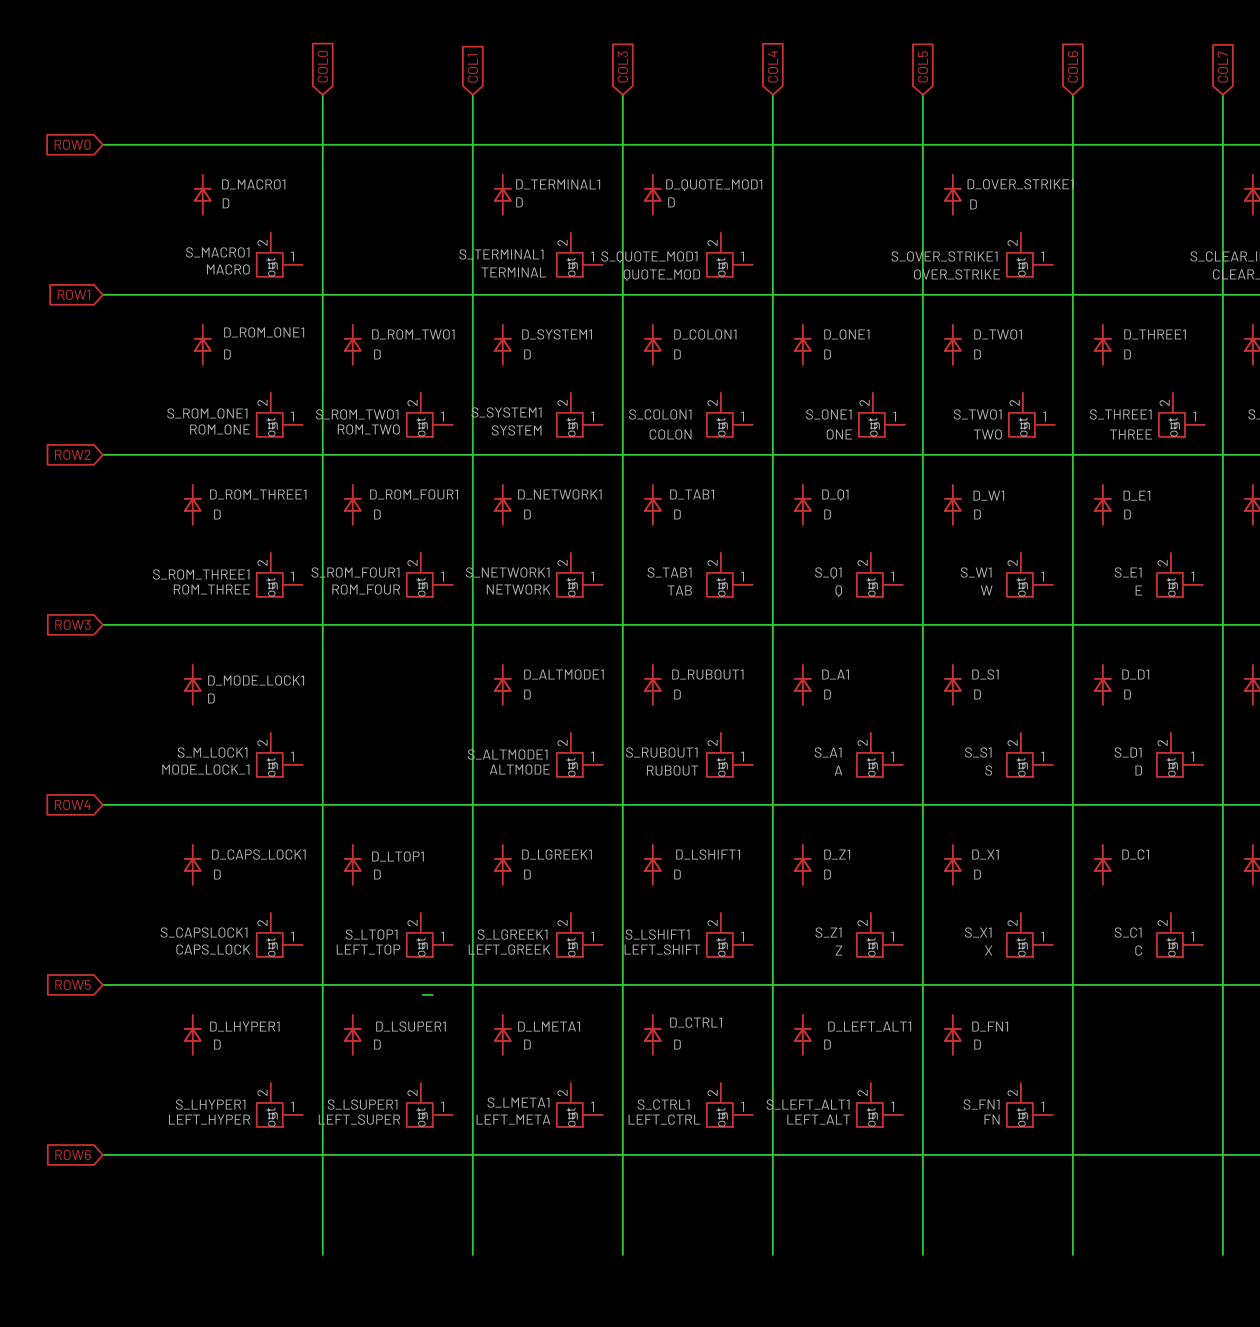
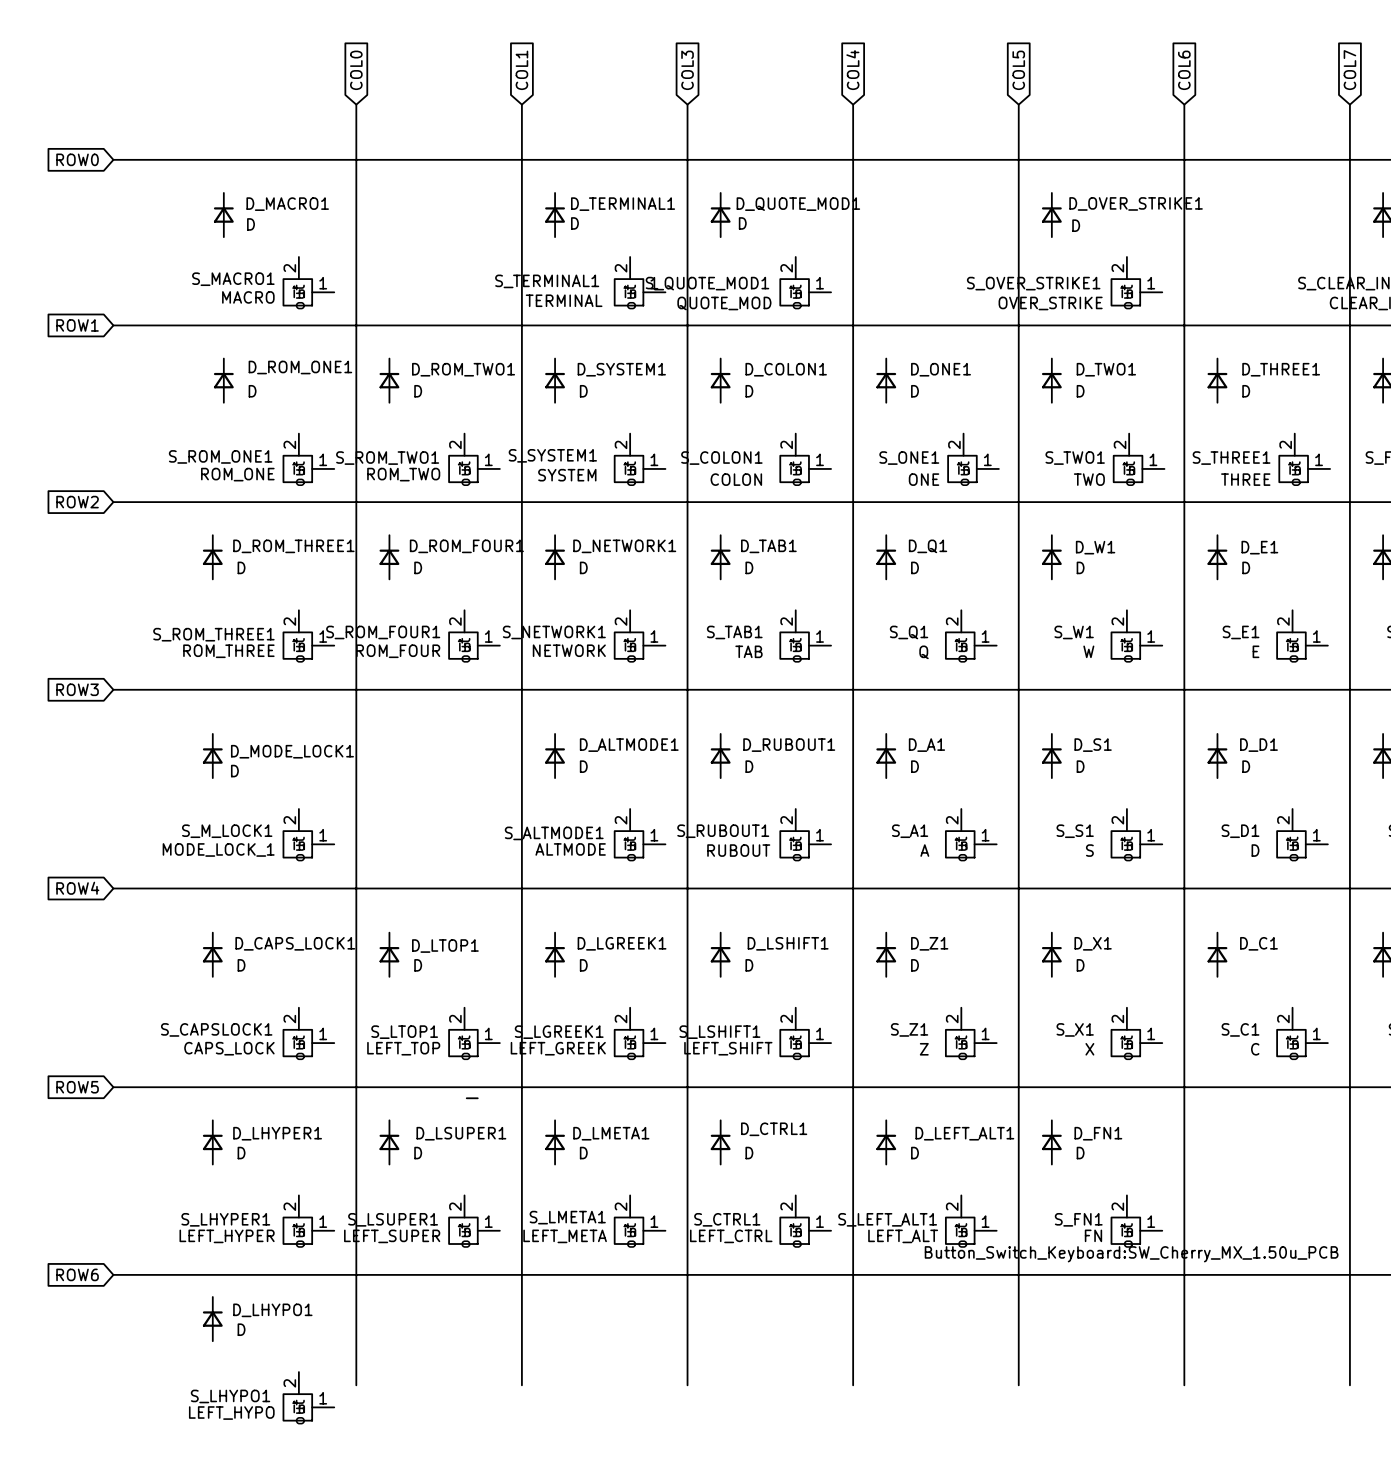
S_FN1 text: none -> Button_Switch_Keyboard:SW_Cherry_MX_1.50u_PCB (1131, 1254)
D_LHYPO1: none -> D (212, 1319)
S_LHYPO1: none -> LEFT_HYPO (308, 1396)

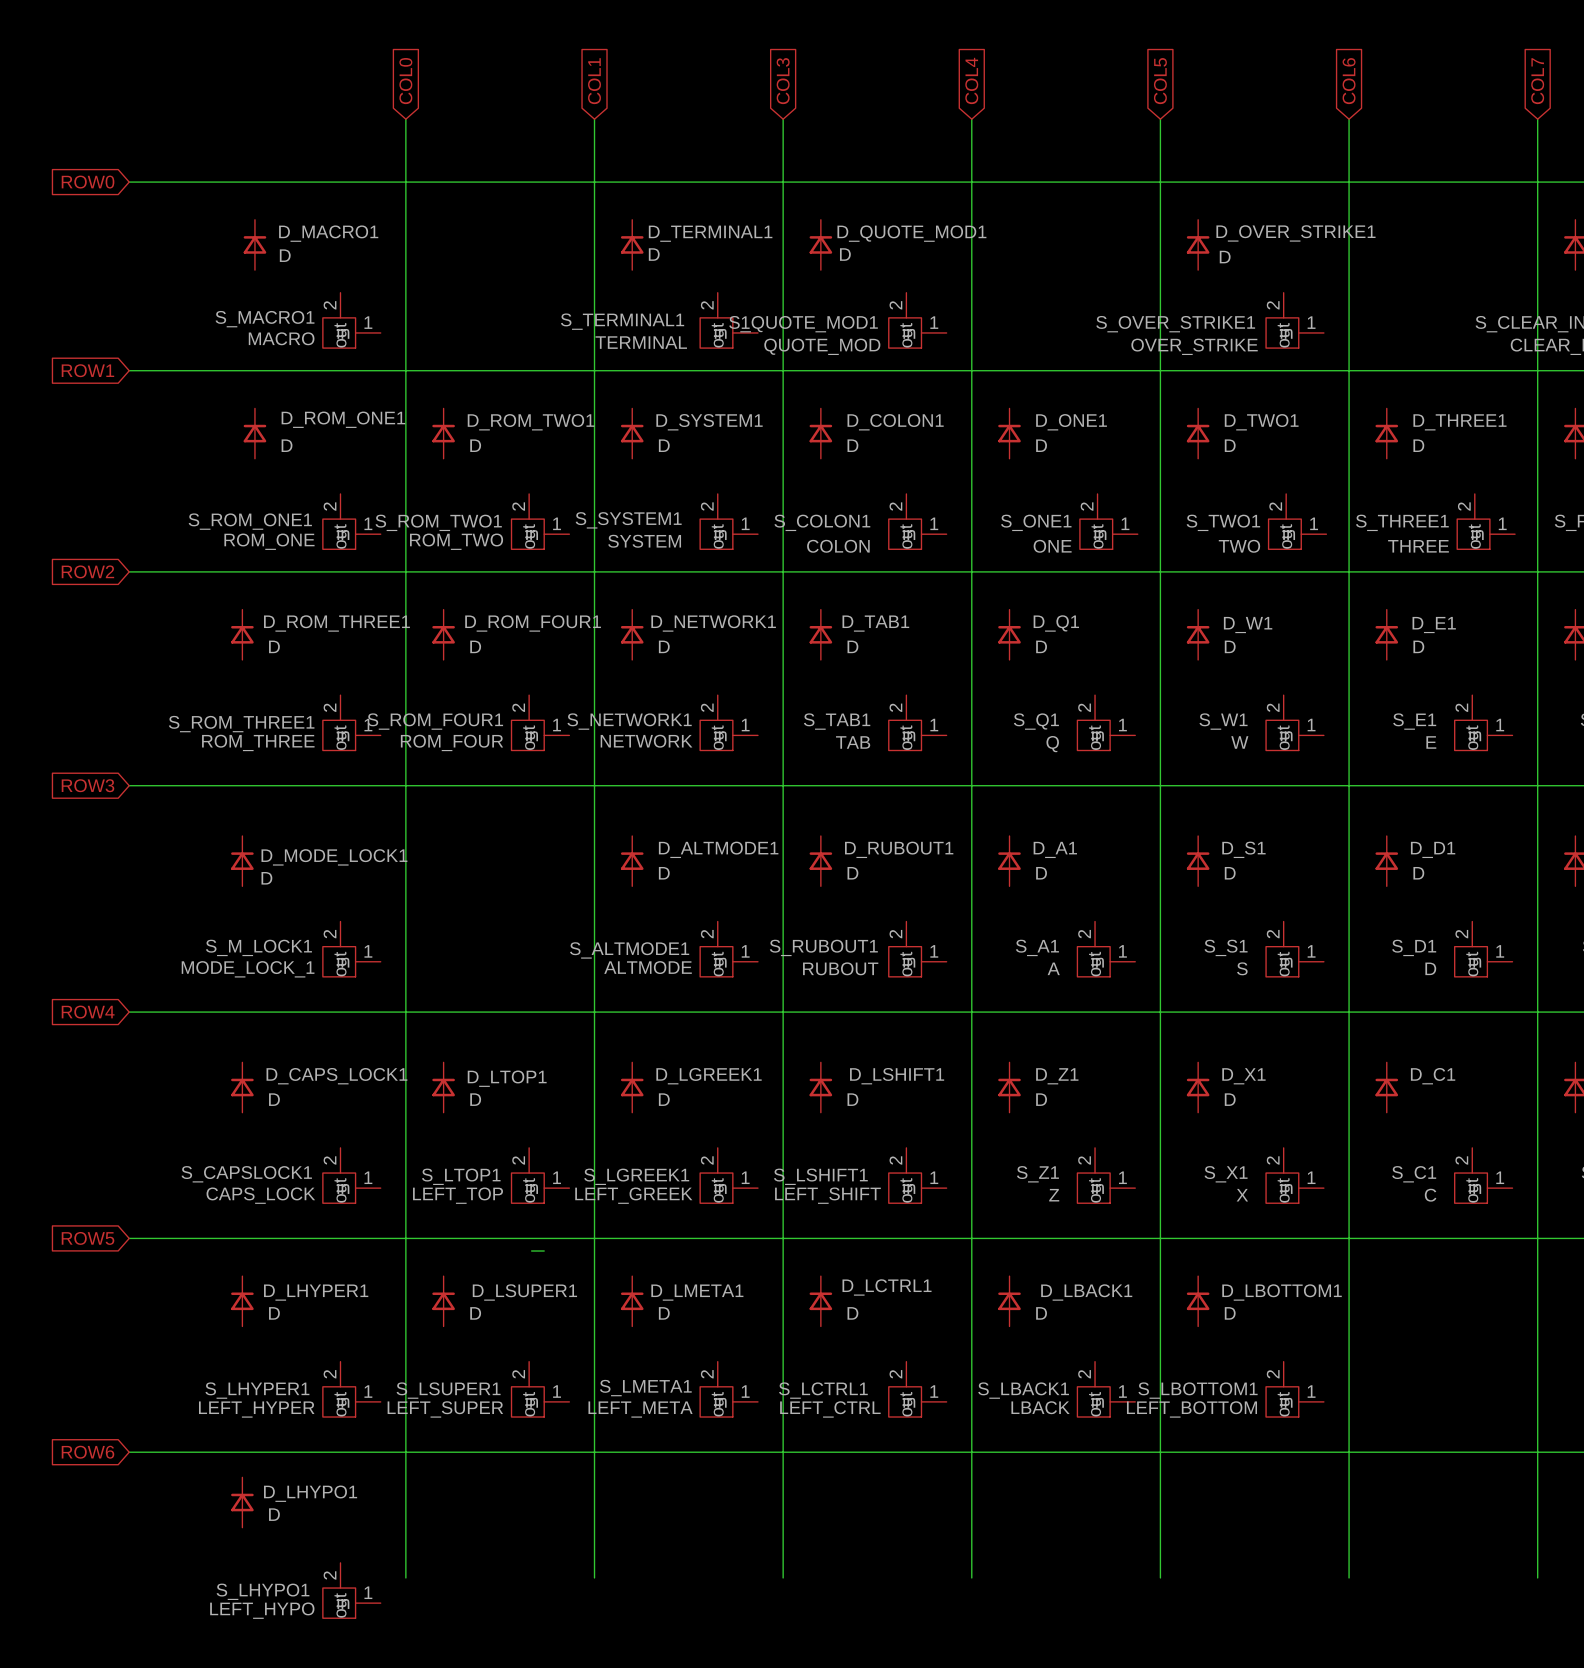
D_CTRL1 name: D_CTRL1 (774, 1129) -> D_LCTRL1 (887, 1287)
D_LEFT_ALT1 name: D_LEFT_ALT1 (964, 1133) -> D_LBACK1 (1086, 1292)
D_FN1 name: D_FN1 (1098, 1133) -> D_LBOTTOM1 (1282, 1292)
S_CTRL1 name: S_CTRL1 (727, 1219) -> S_LCTRL1 (823, 1390)
S_LEFT_ALT1 name: S_LEFT_ALT1 (887, 1219) -> S_LBACK1 (1023, 1390)
S_FN1 name: S_FN1 (1078, 1219) -> S_LBOTTOM1 (1198, 1390)
S_FN1 value: FN (1093, 1235) -> LEFT_BOTTOM (1191, 1409)
S_LEFT_ALT1 value: LEFT_ALT (903, 1236) -> LBACK (1040, 1407)
S_FN1 text: Button_Switch_Keyboard:SW_Cherry_MX_1.50u_PCB (1131, 1254) -> none

